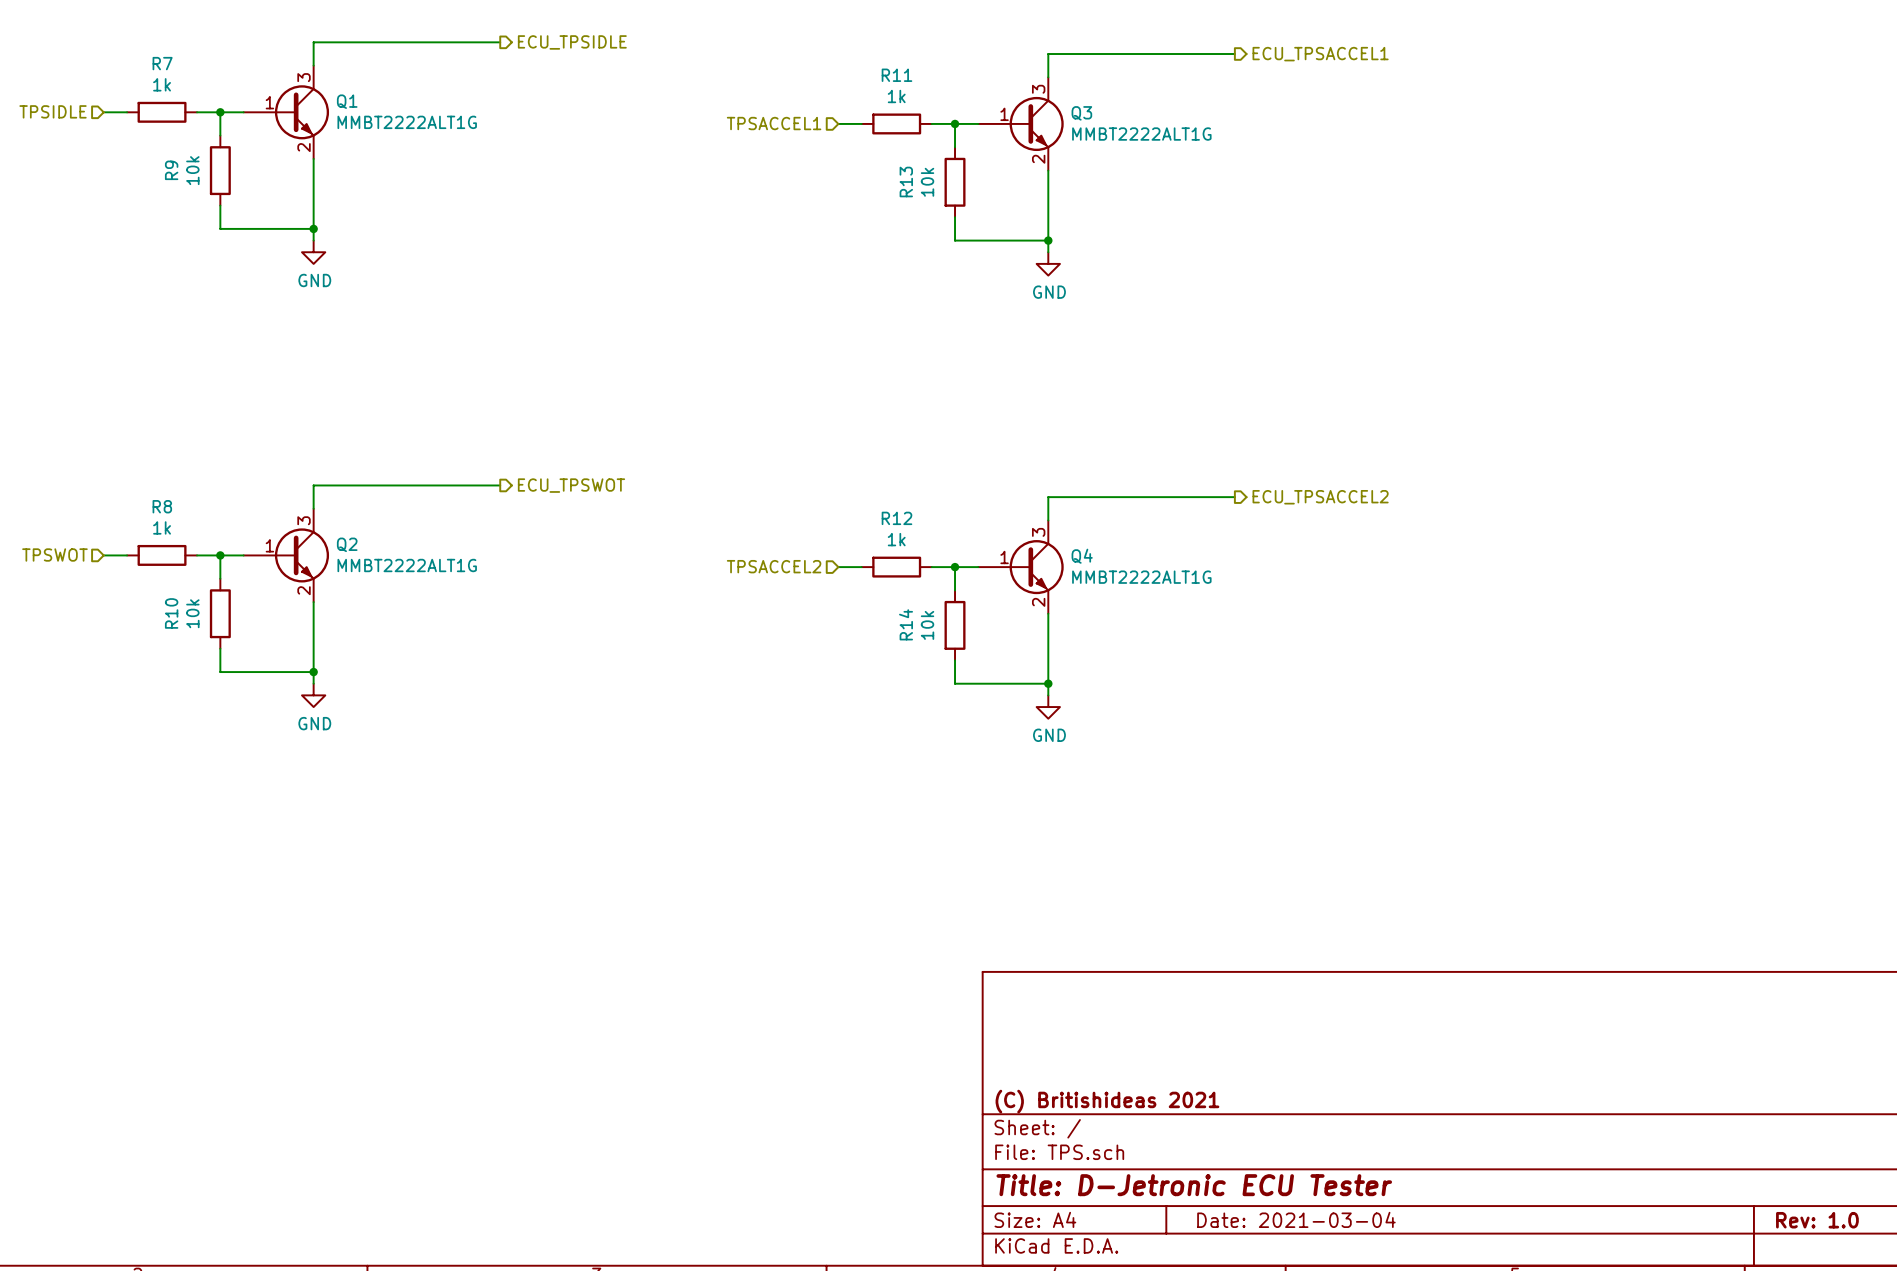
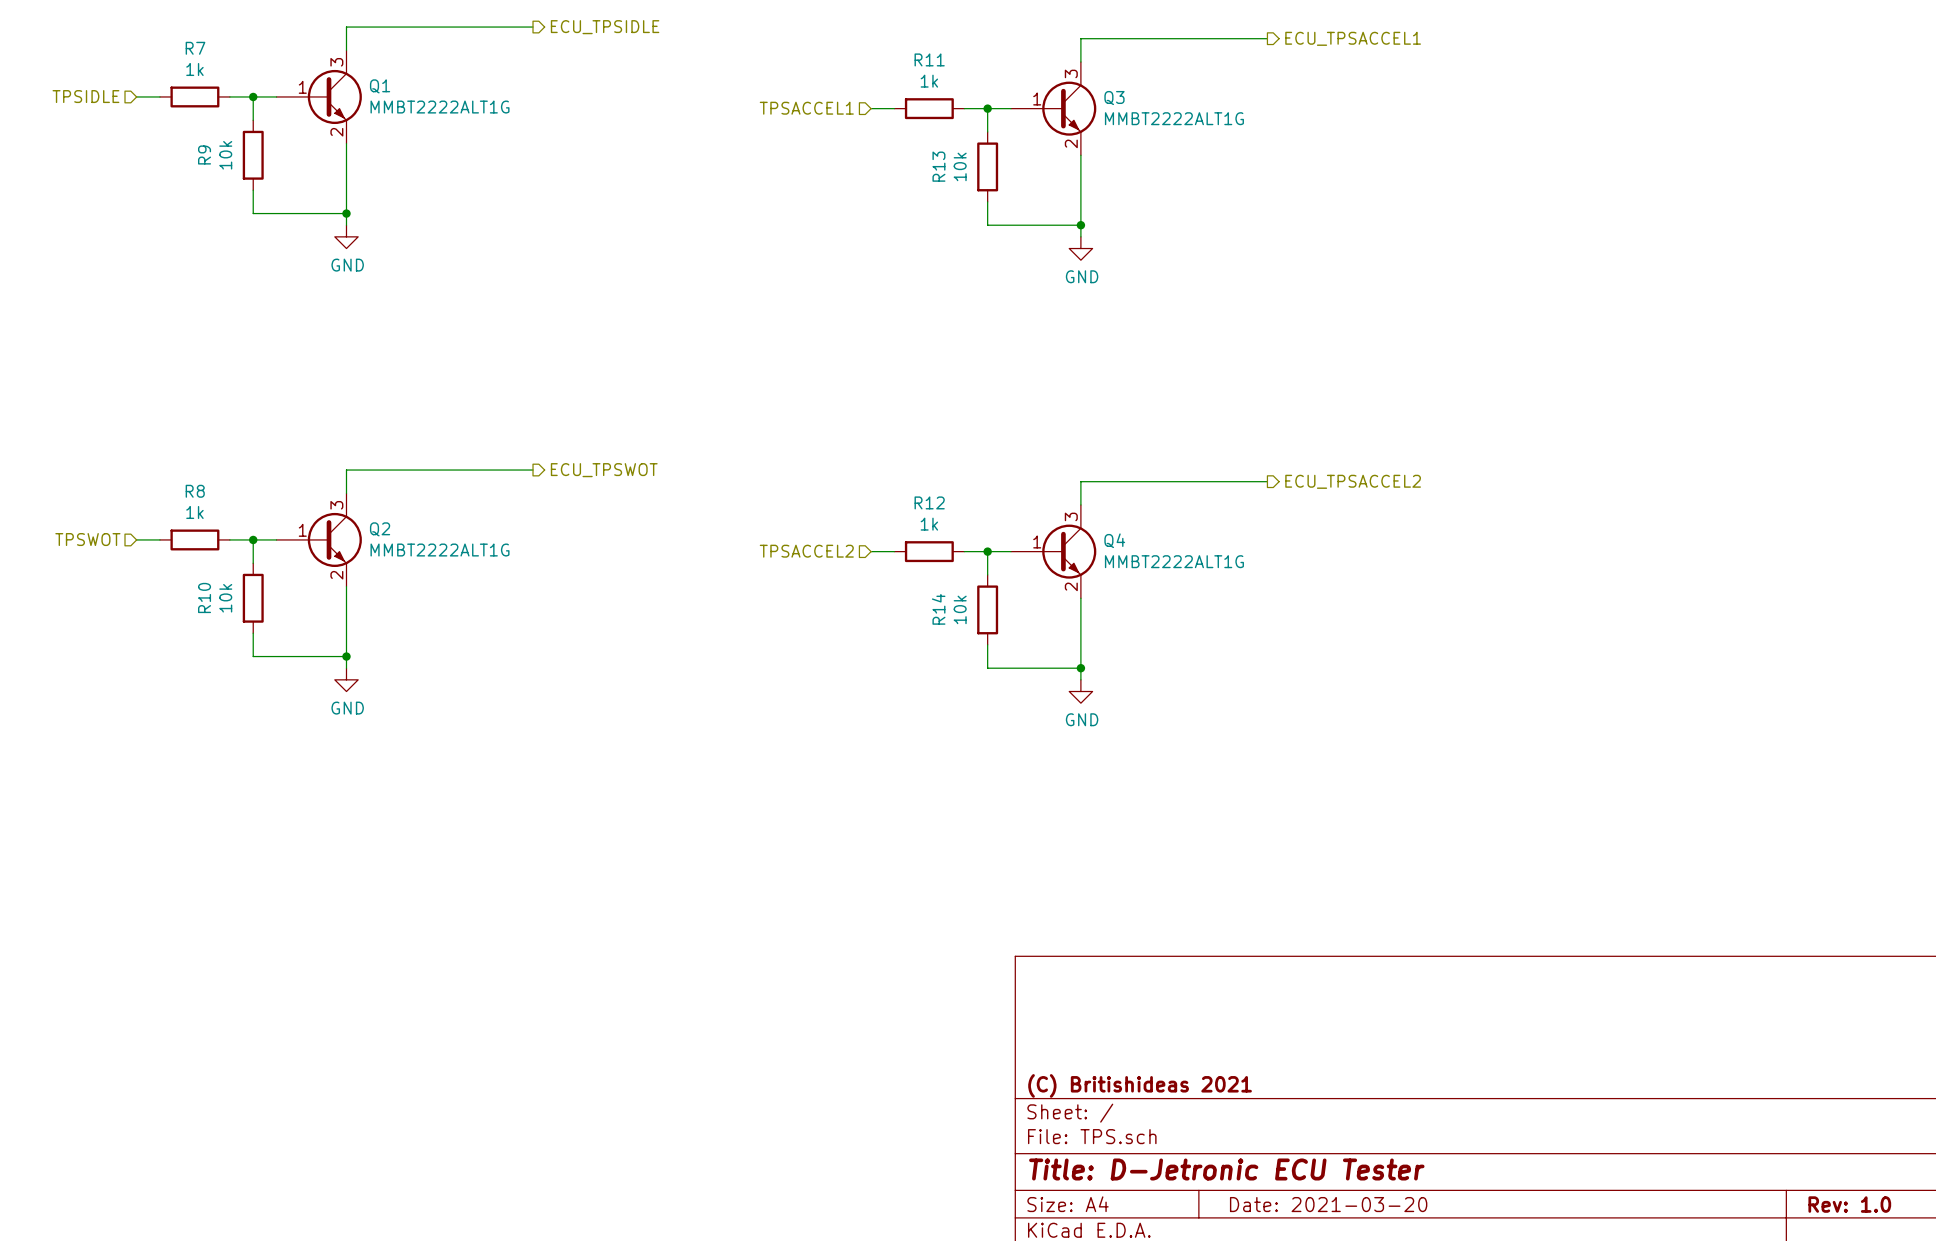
title block: Date: 2021-03-04 (1296, 1219) -> Date: 2021-03-20 (1328, 1204)

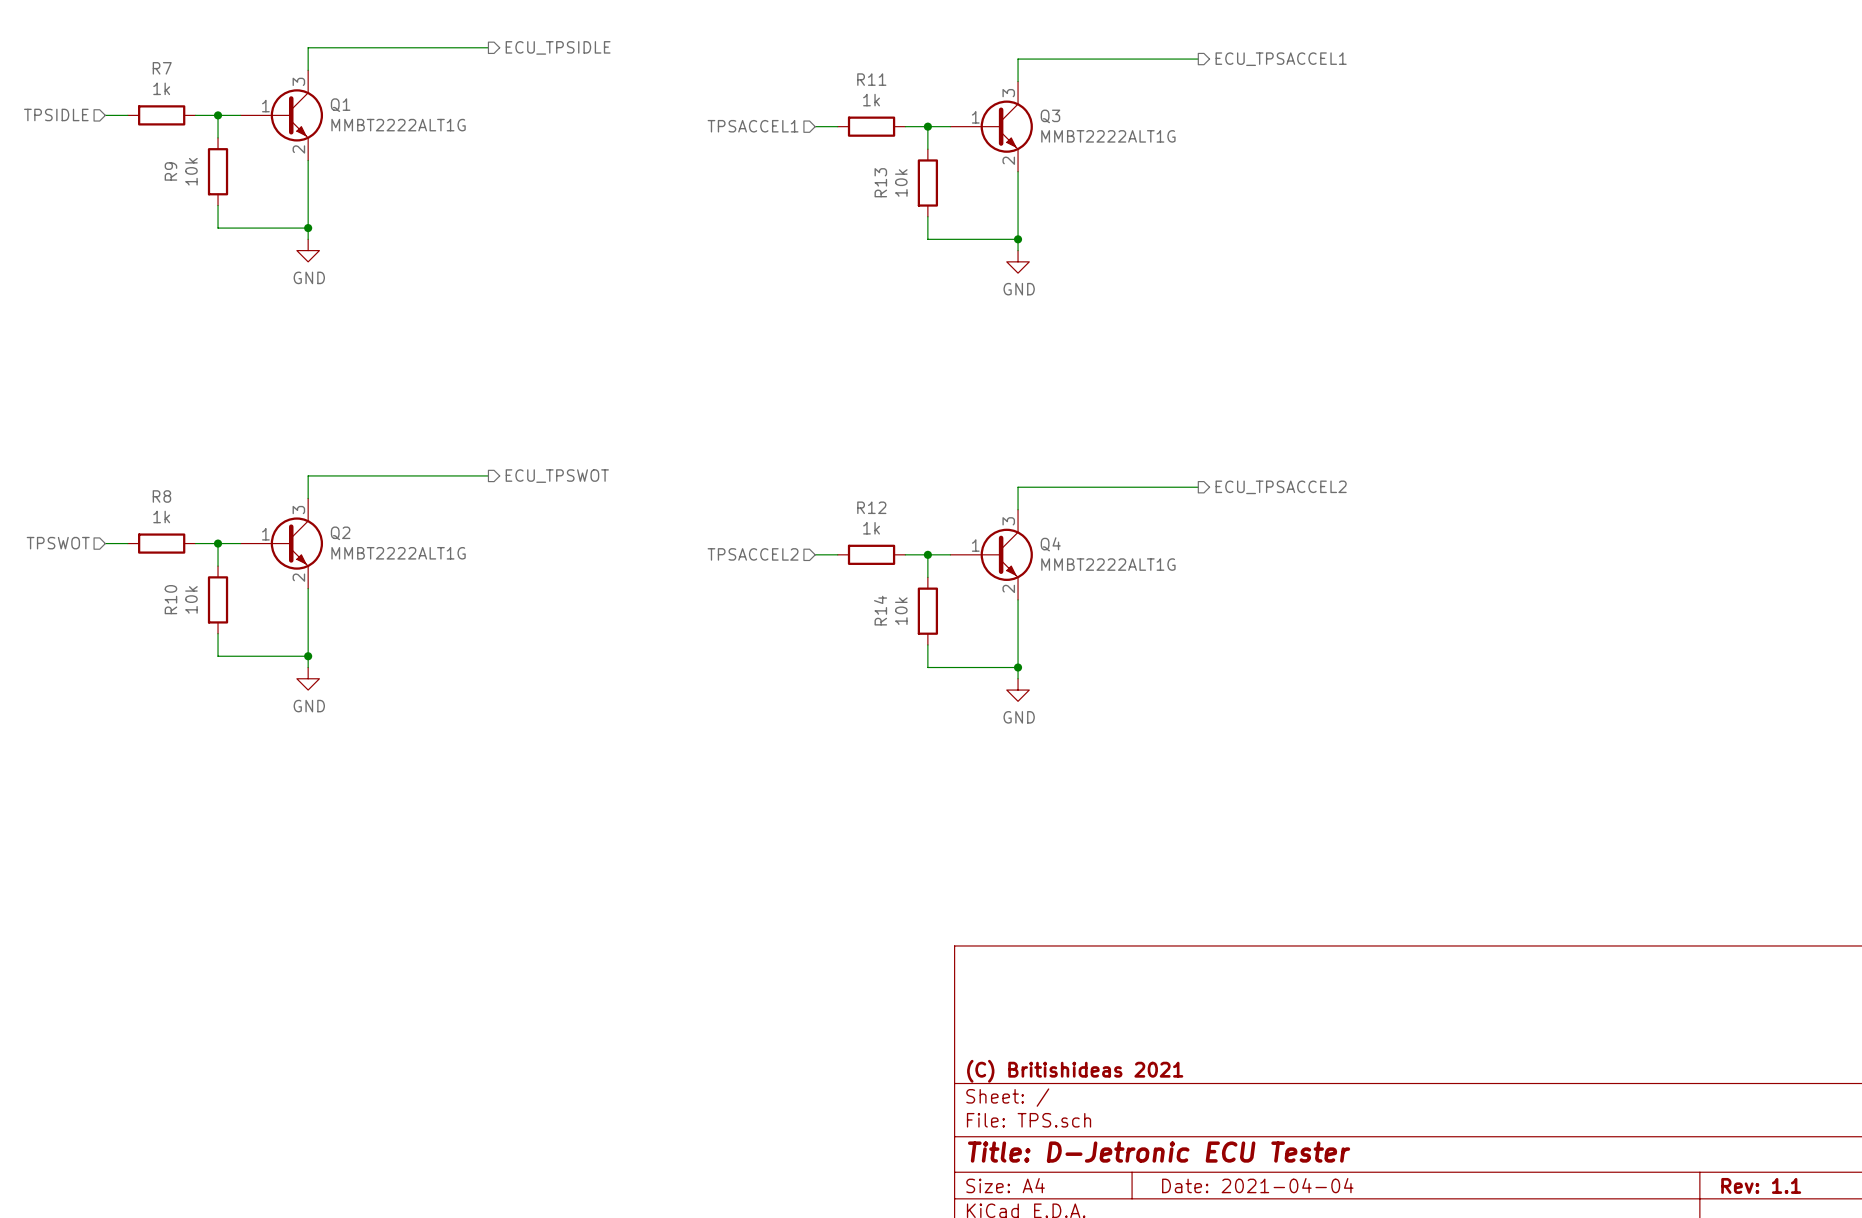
title block: Date: 2021-03-20 (1328, 1204) -> Date: 2021-04-04 (1257, 1185)
title block: Rev: 1.0 (1849, 1204) -> Rev: 1.1 (1761, 1185)

